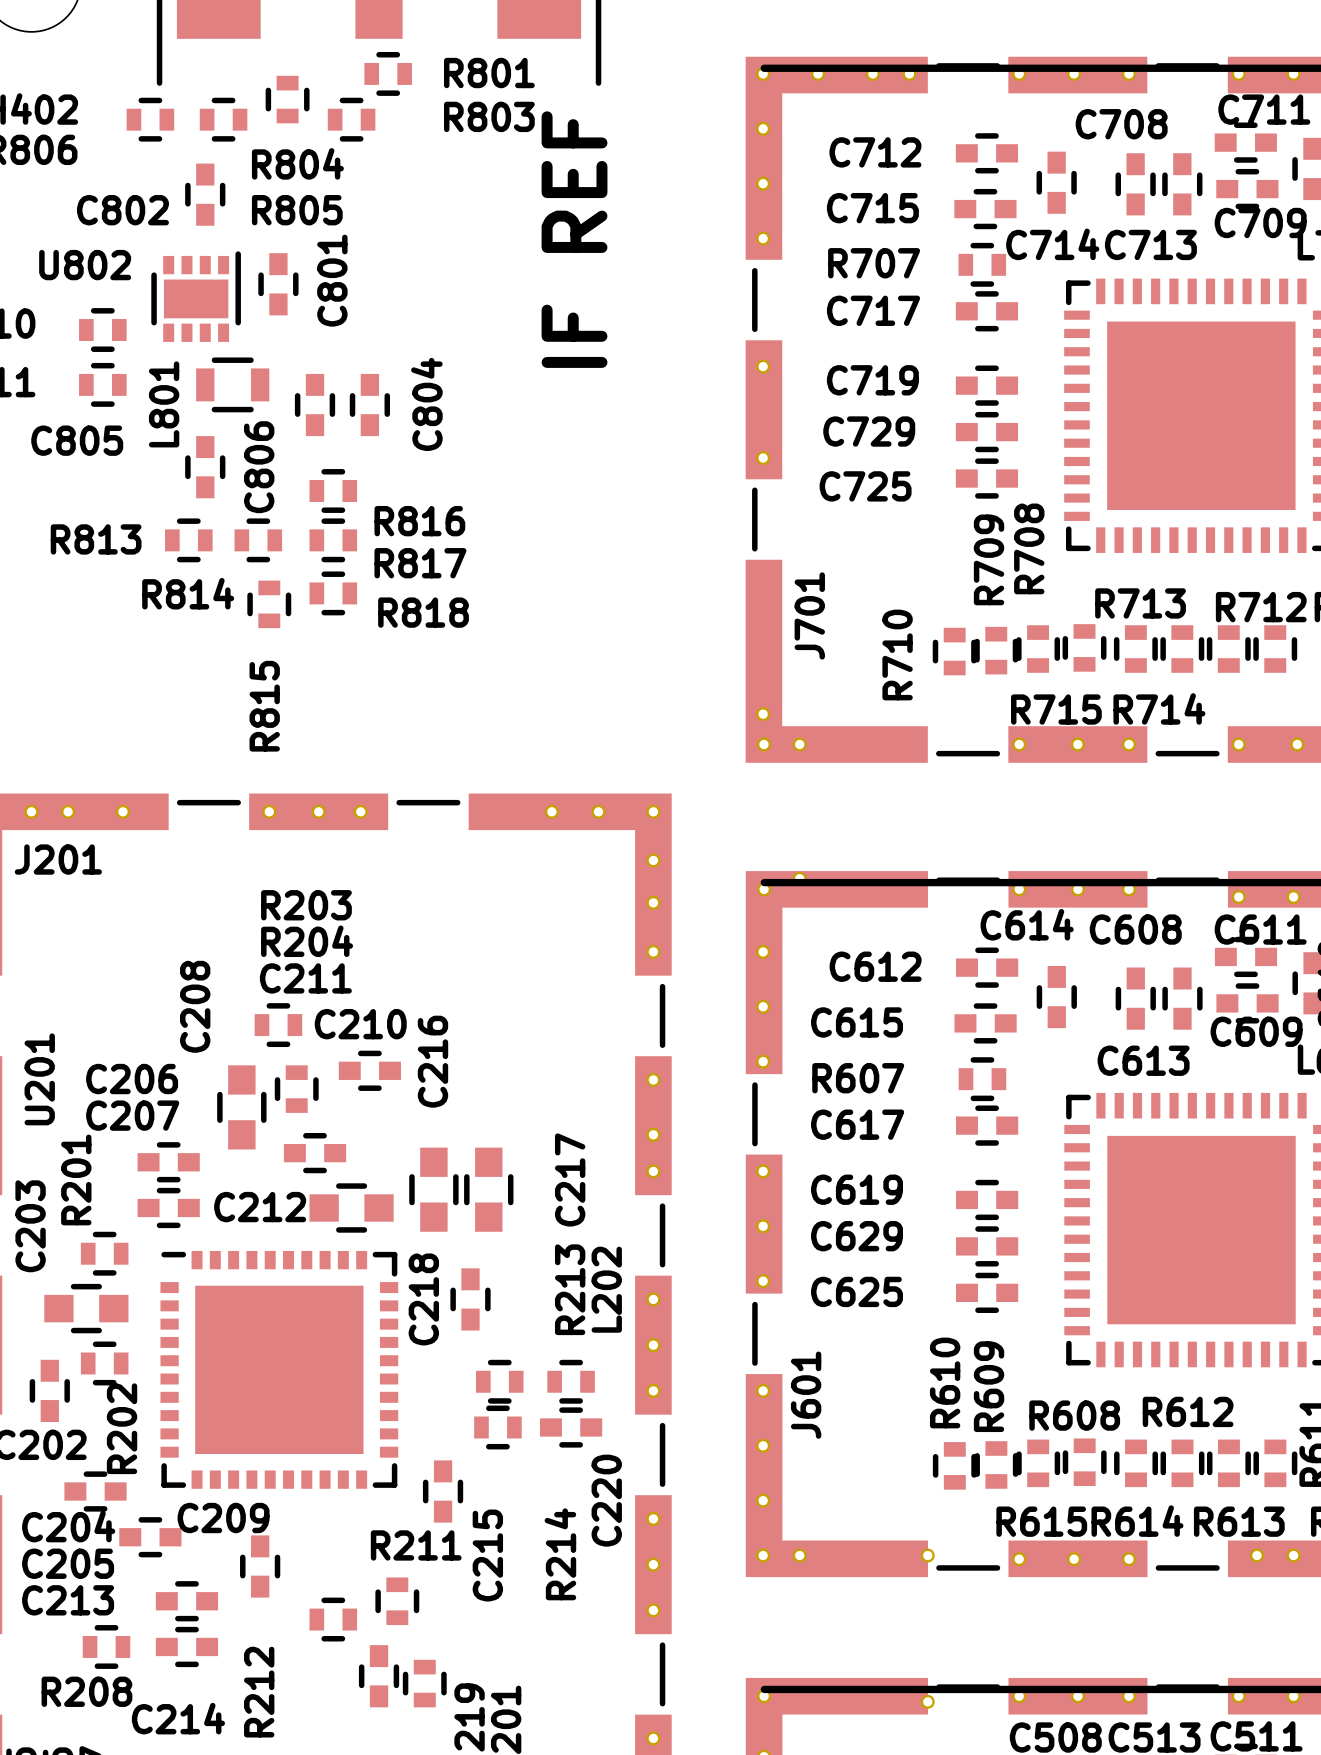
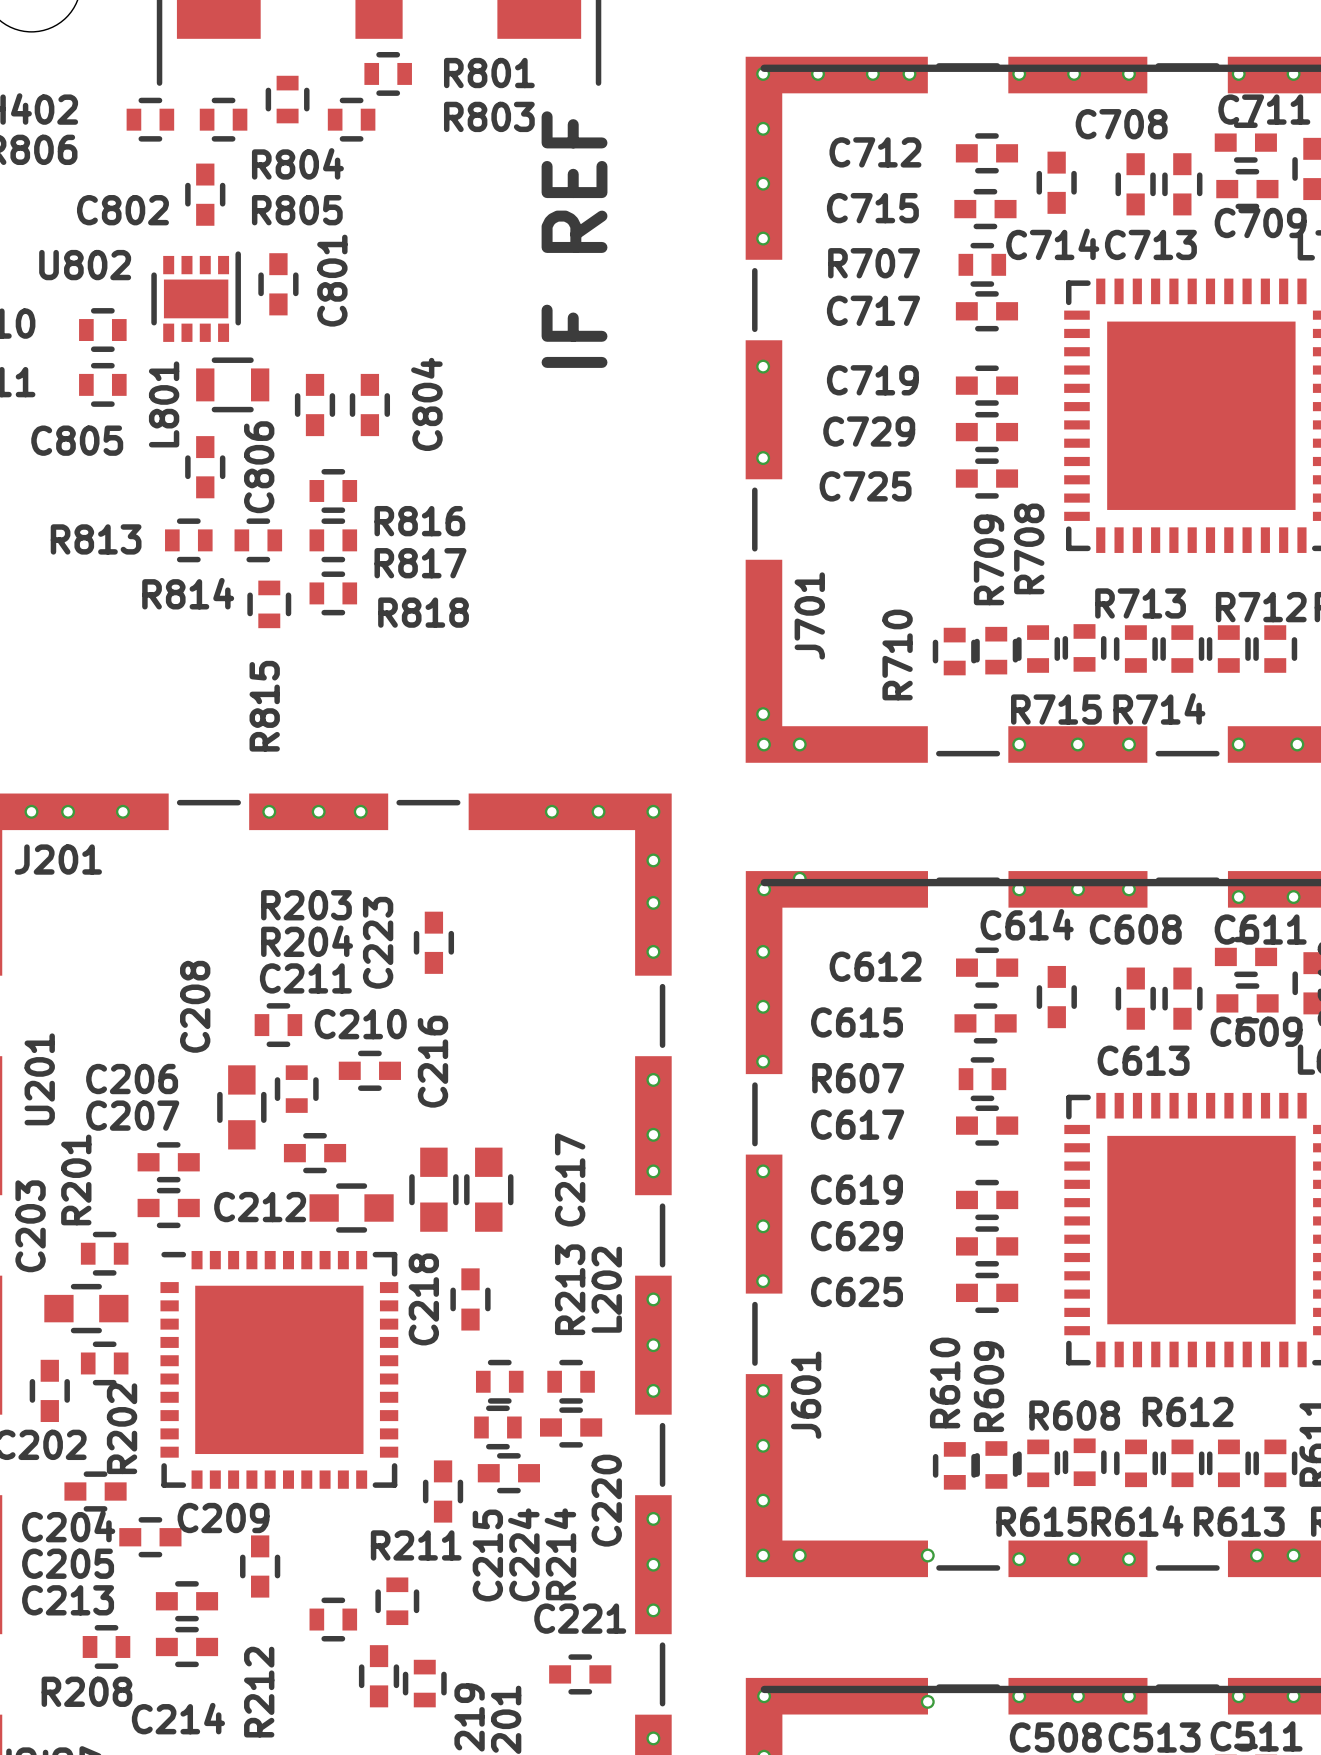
C223: none -> (433, 942)
C224: none -> (508, 1473)
C221: none -> (580, 1674)

